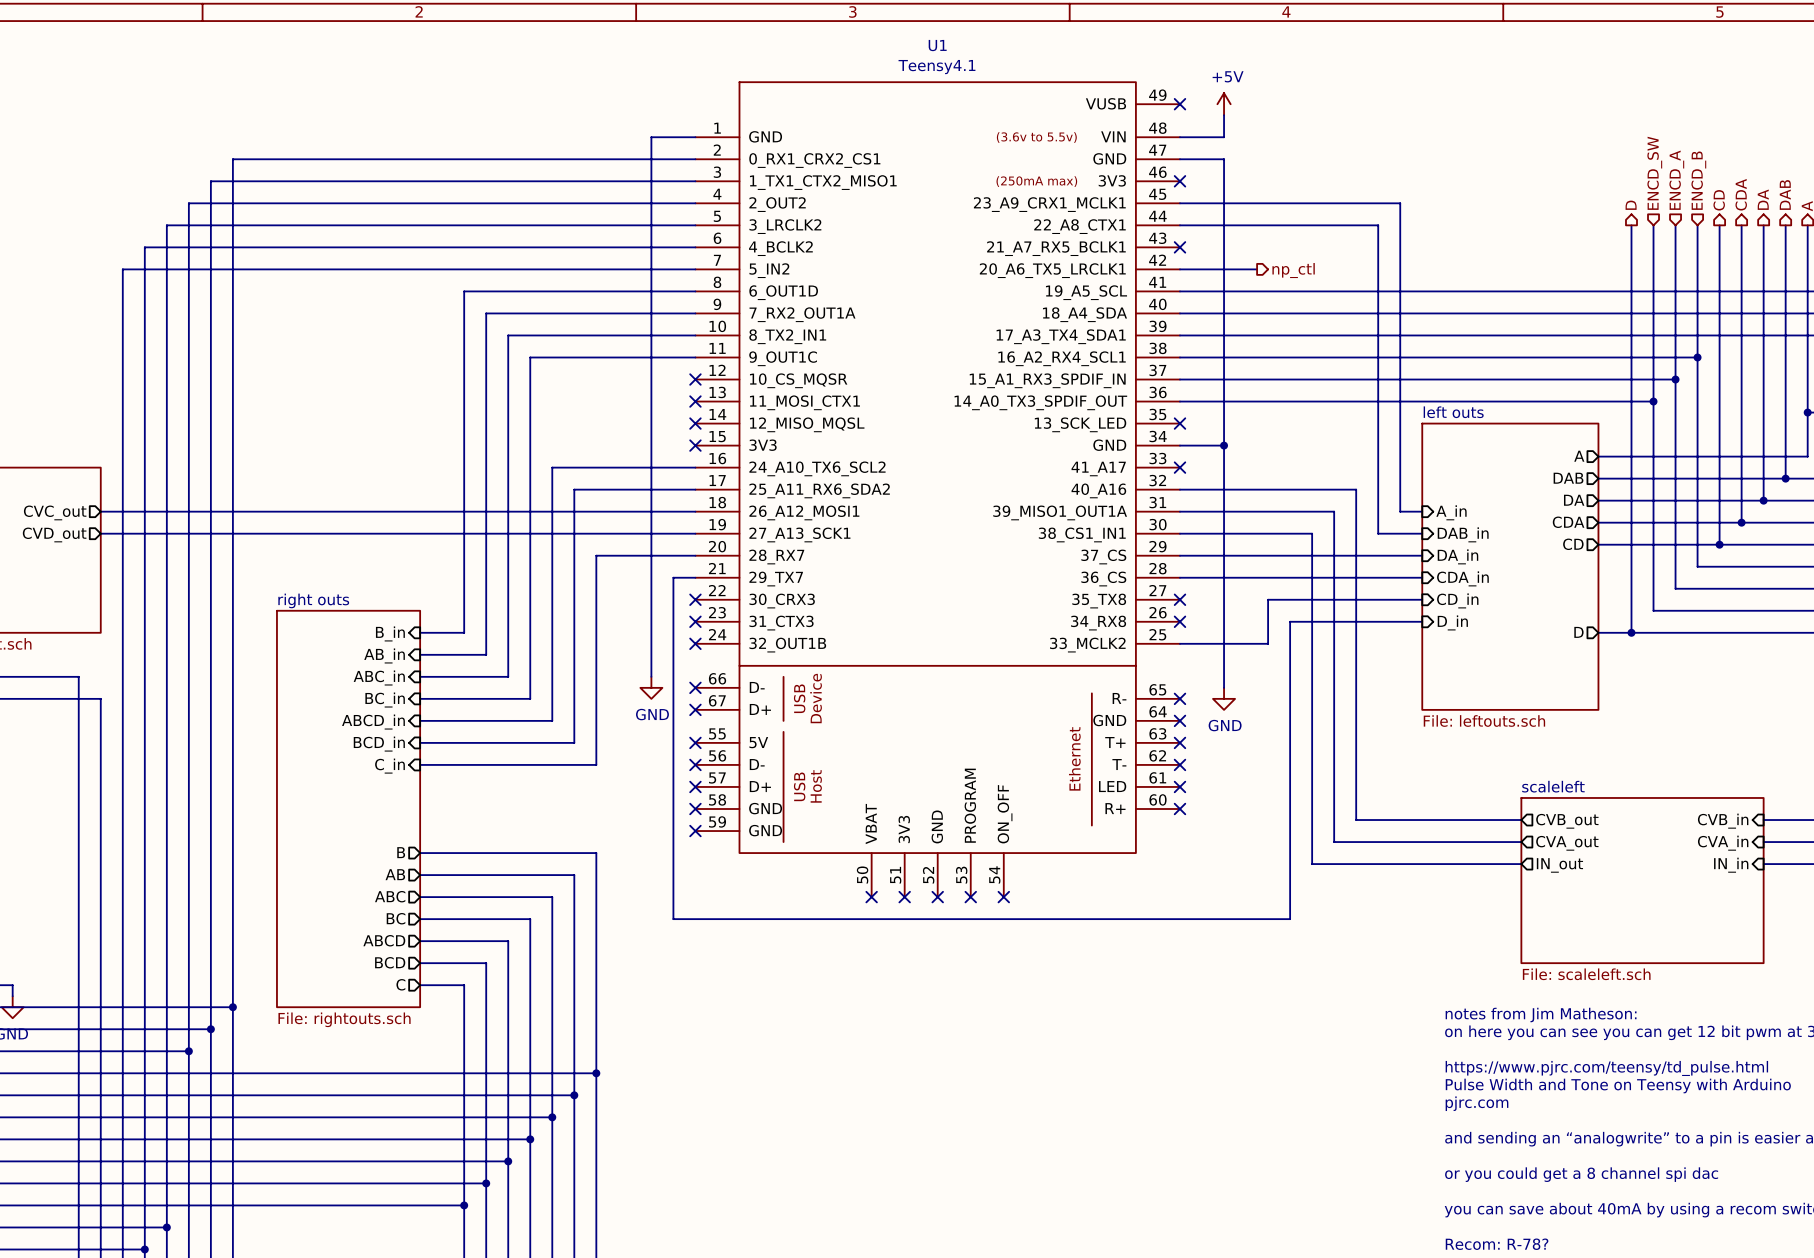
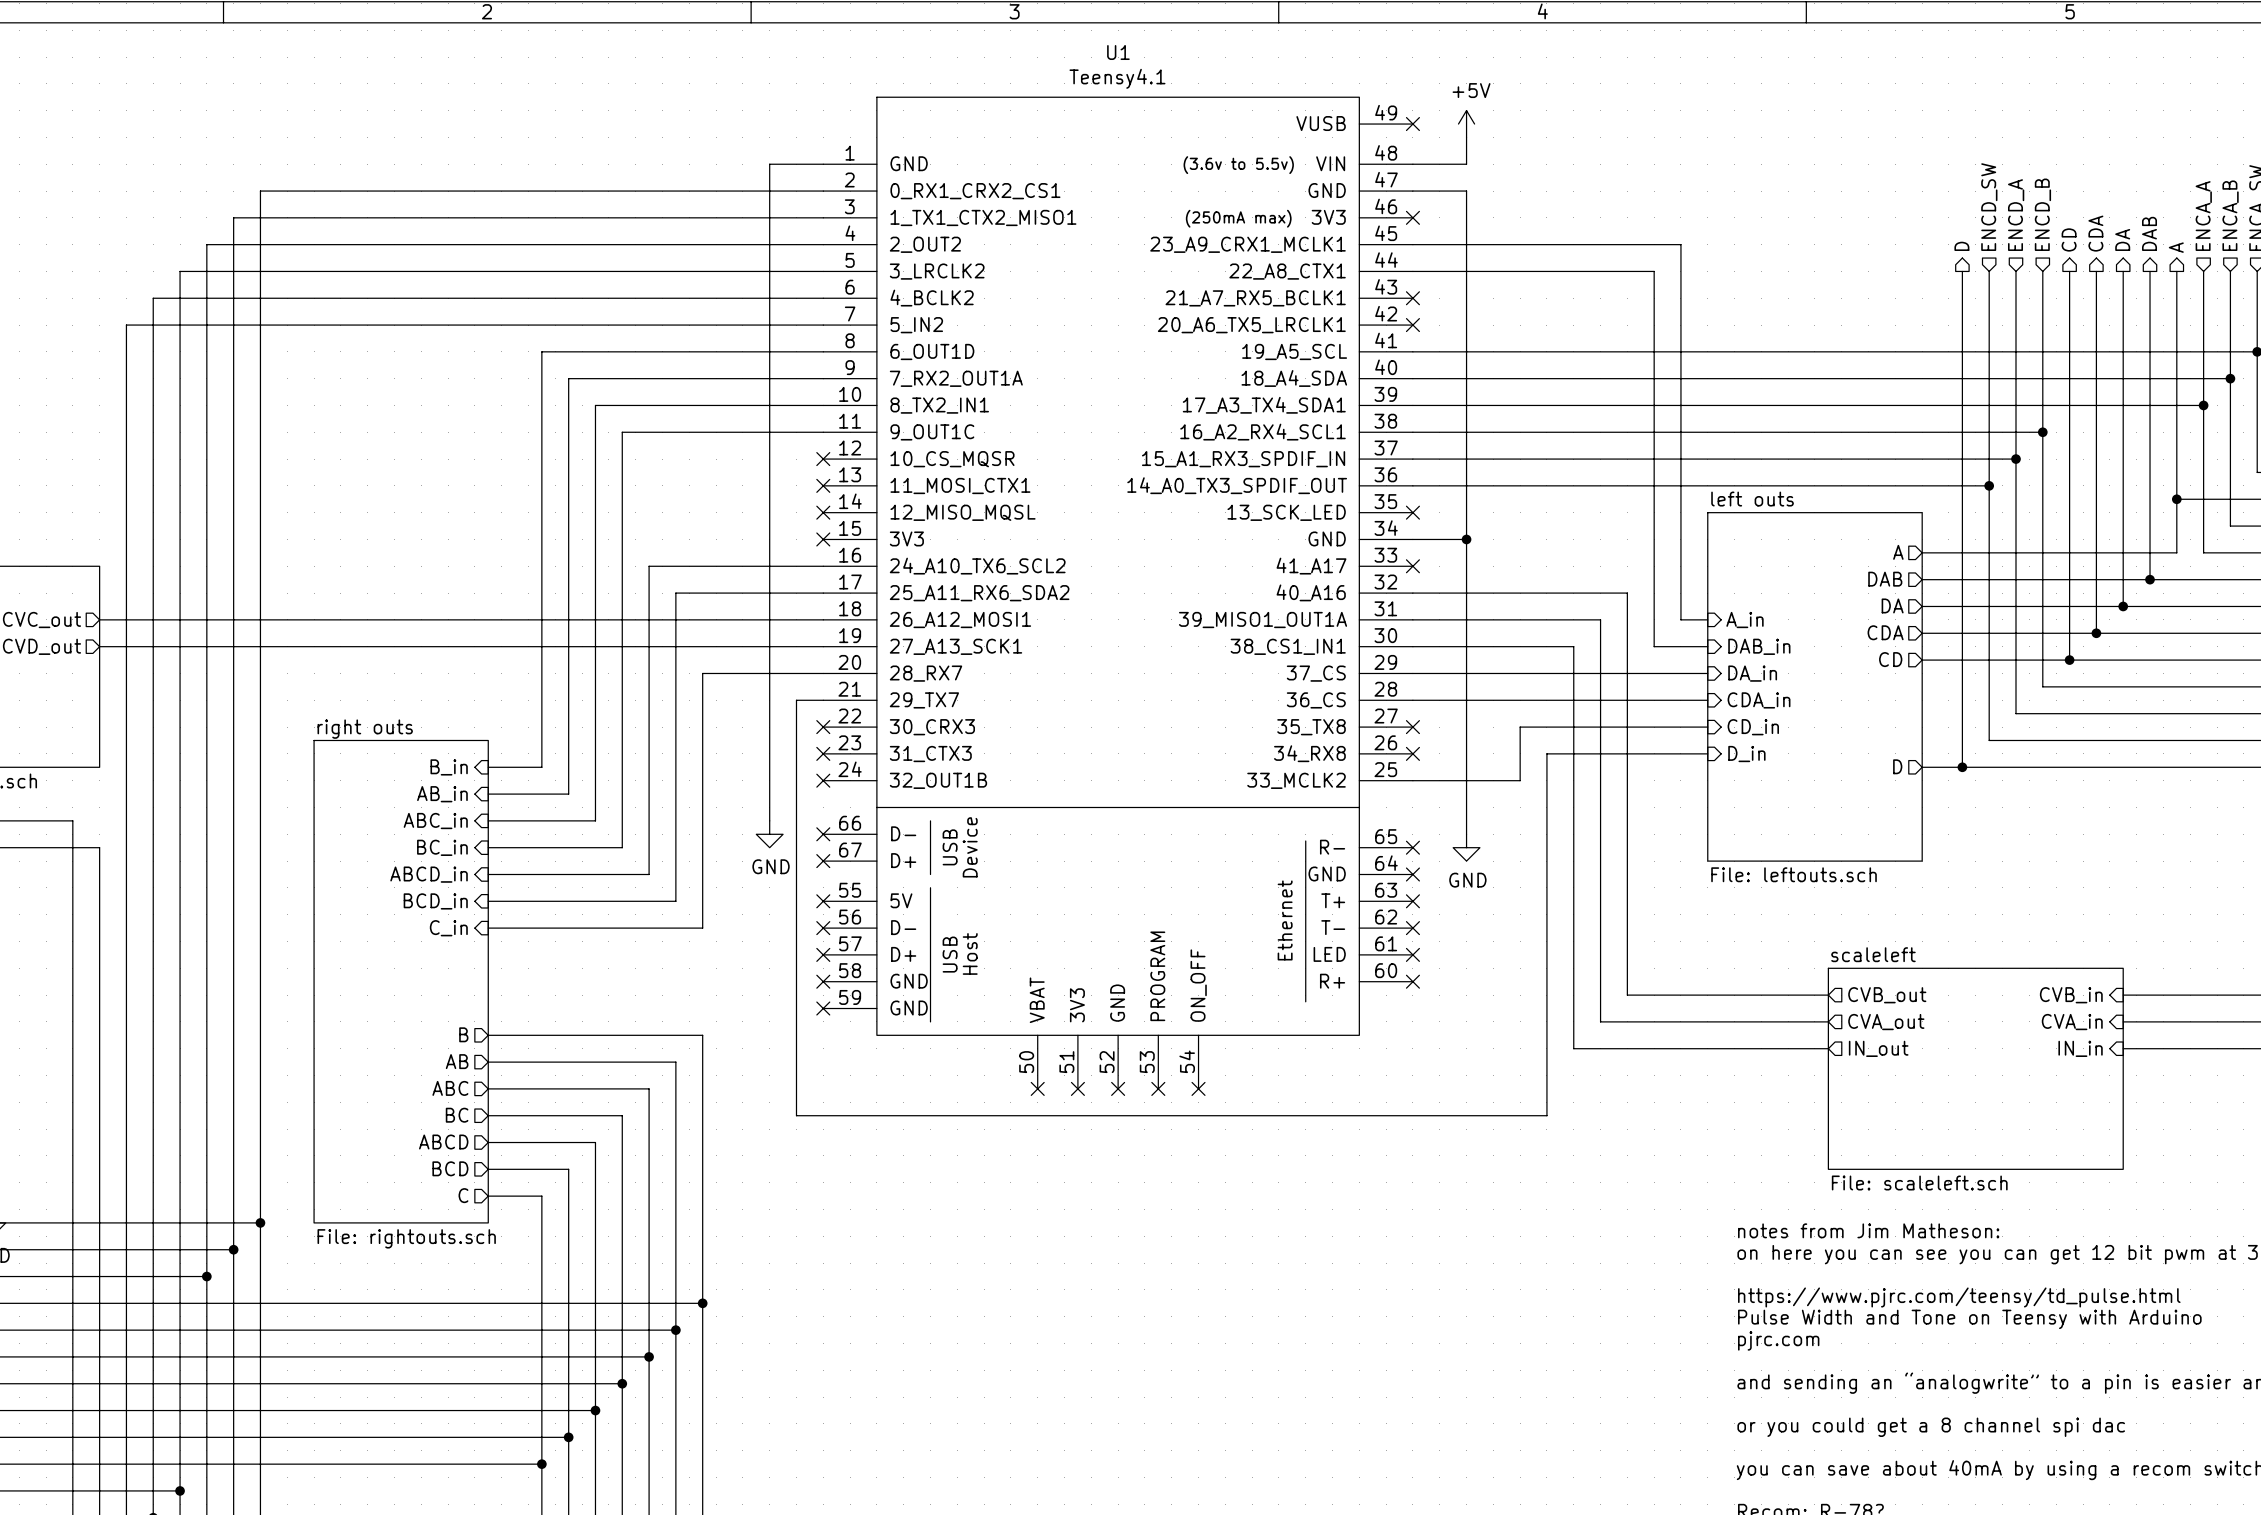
wire: (1179, 269) (1257, 269) -> none
no-connect mark: none -> (1412, 325)
hierarchical label: np_ctl (1293, 270) -> none

